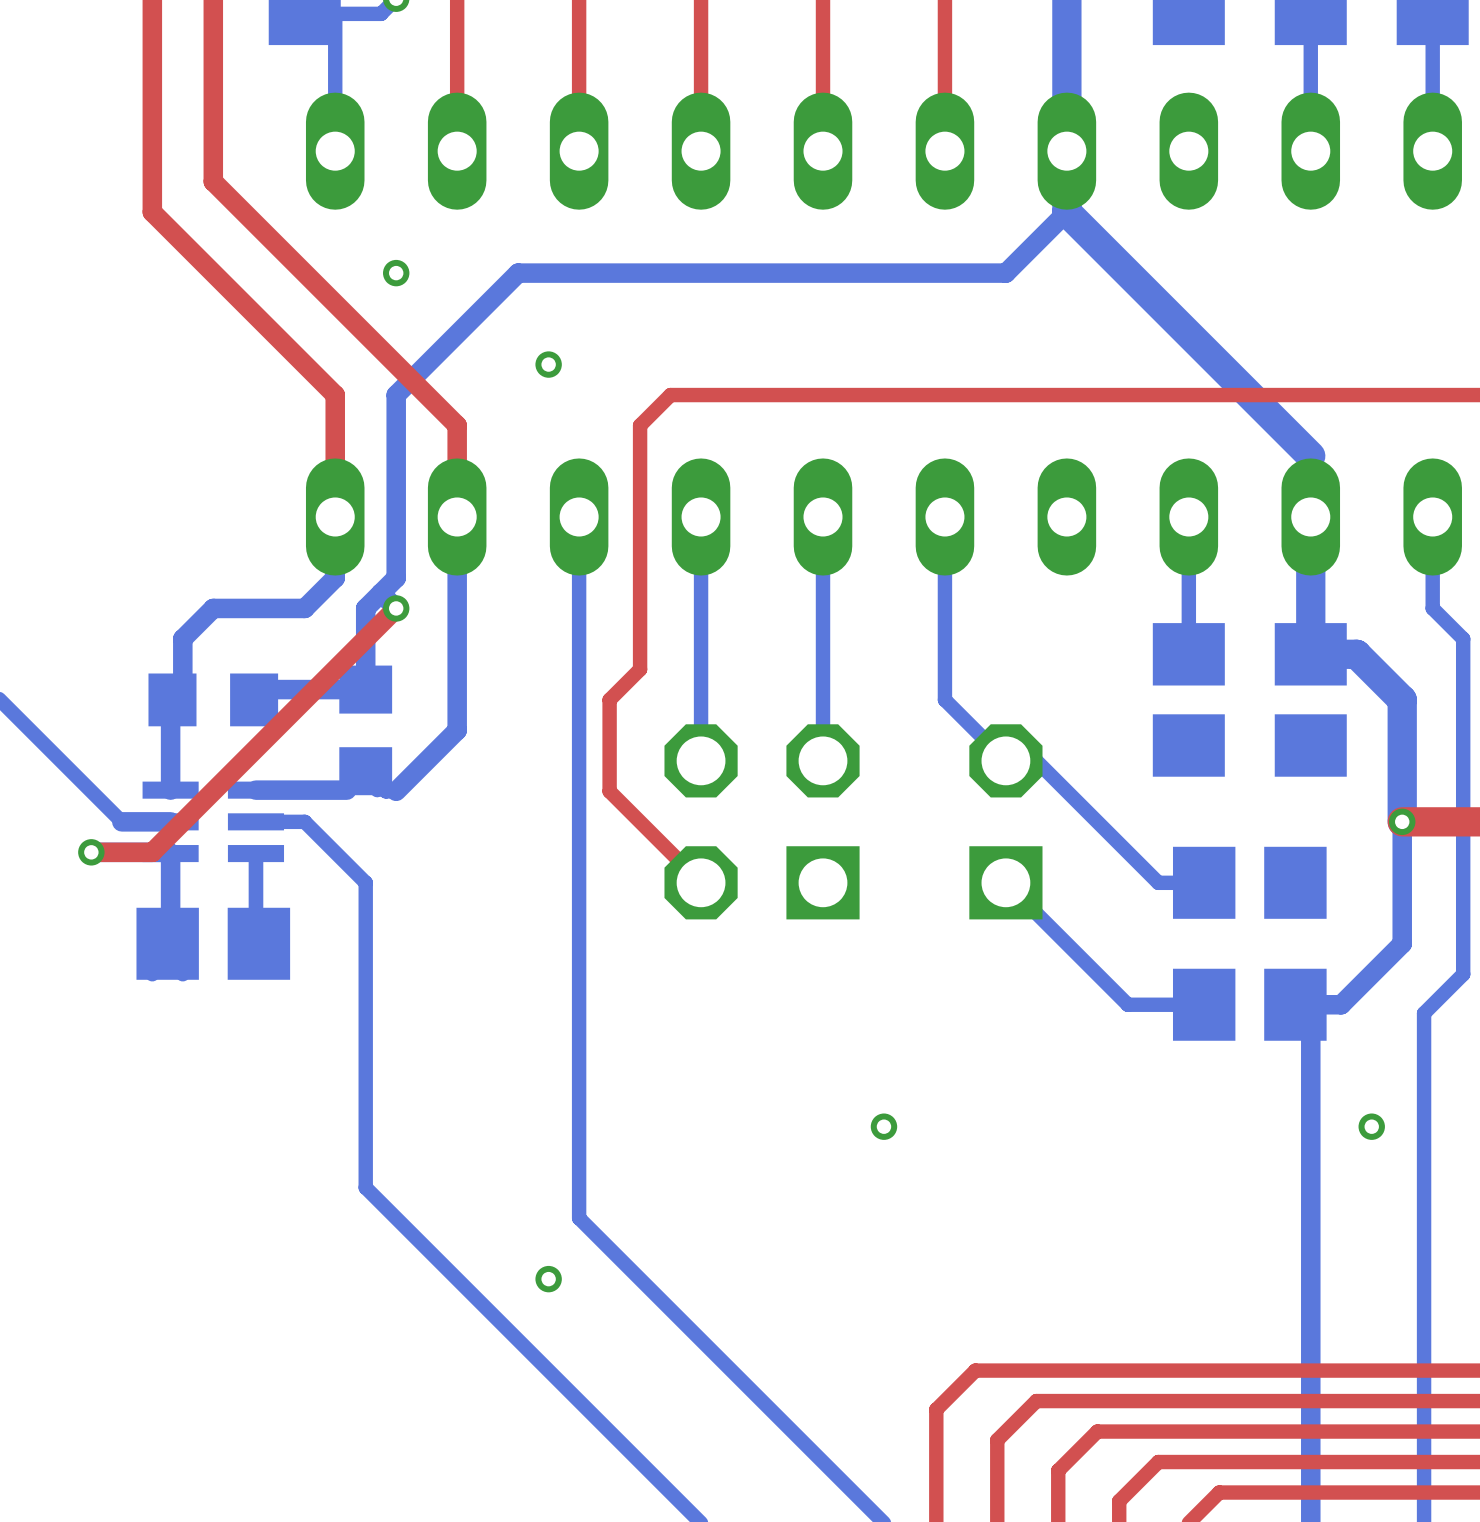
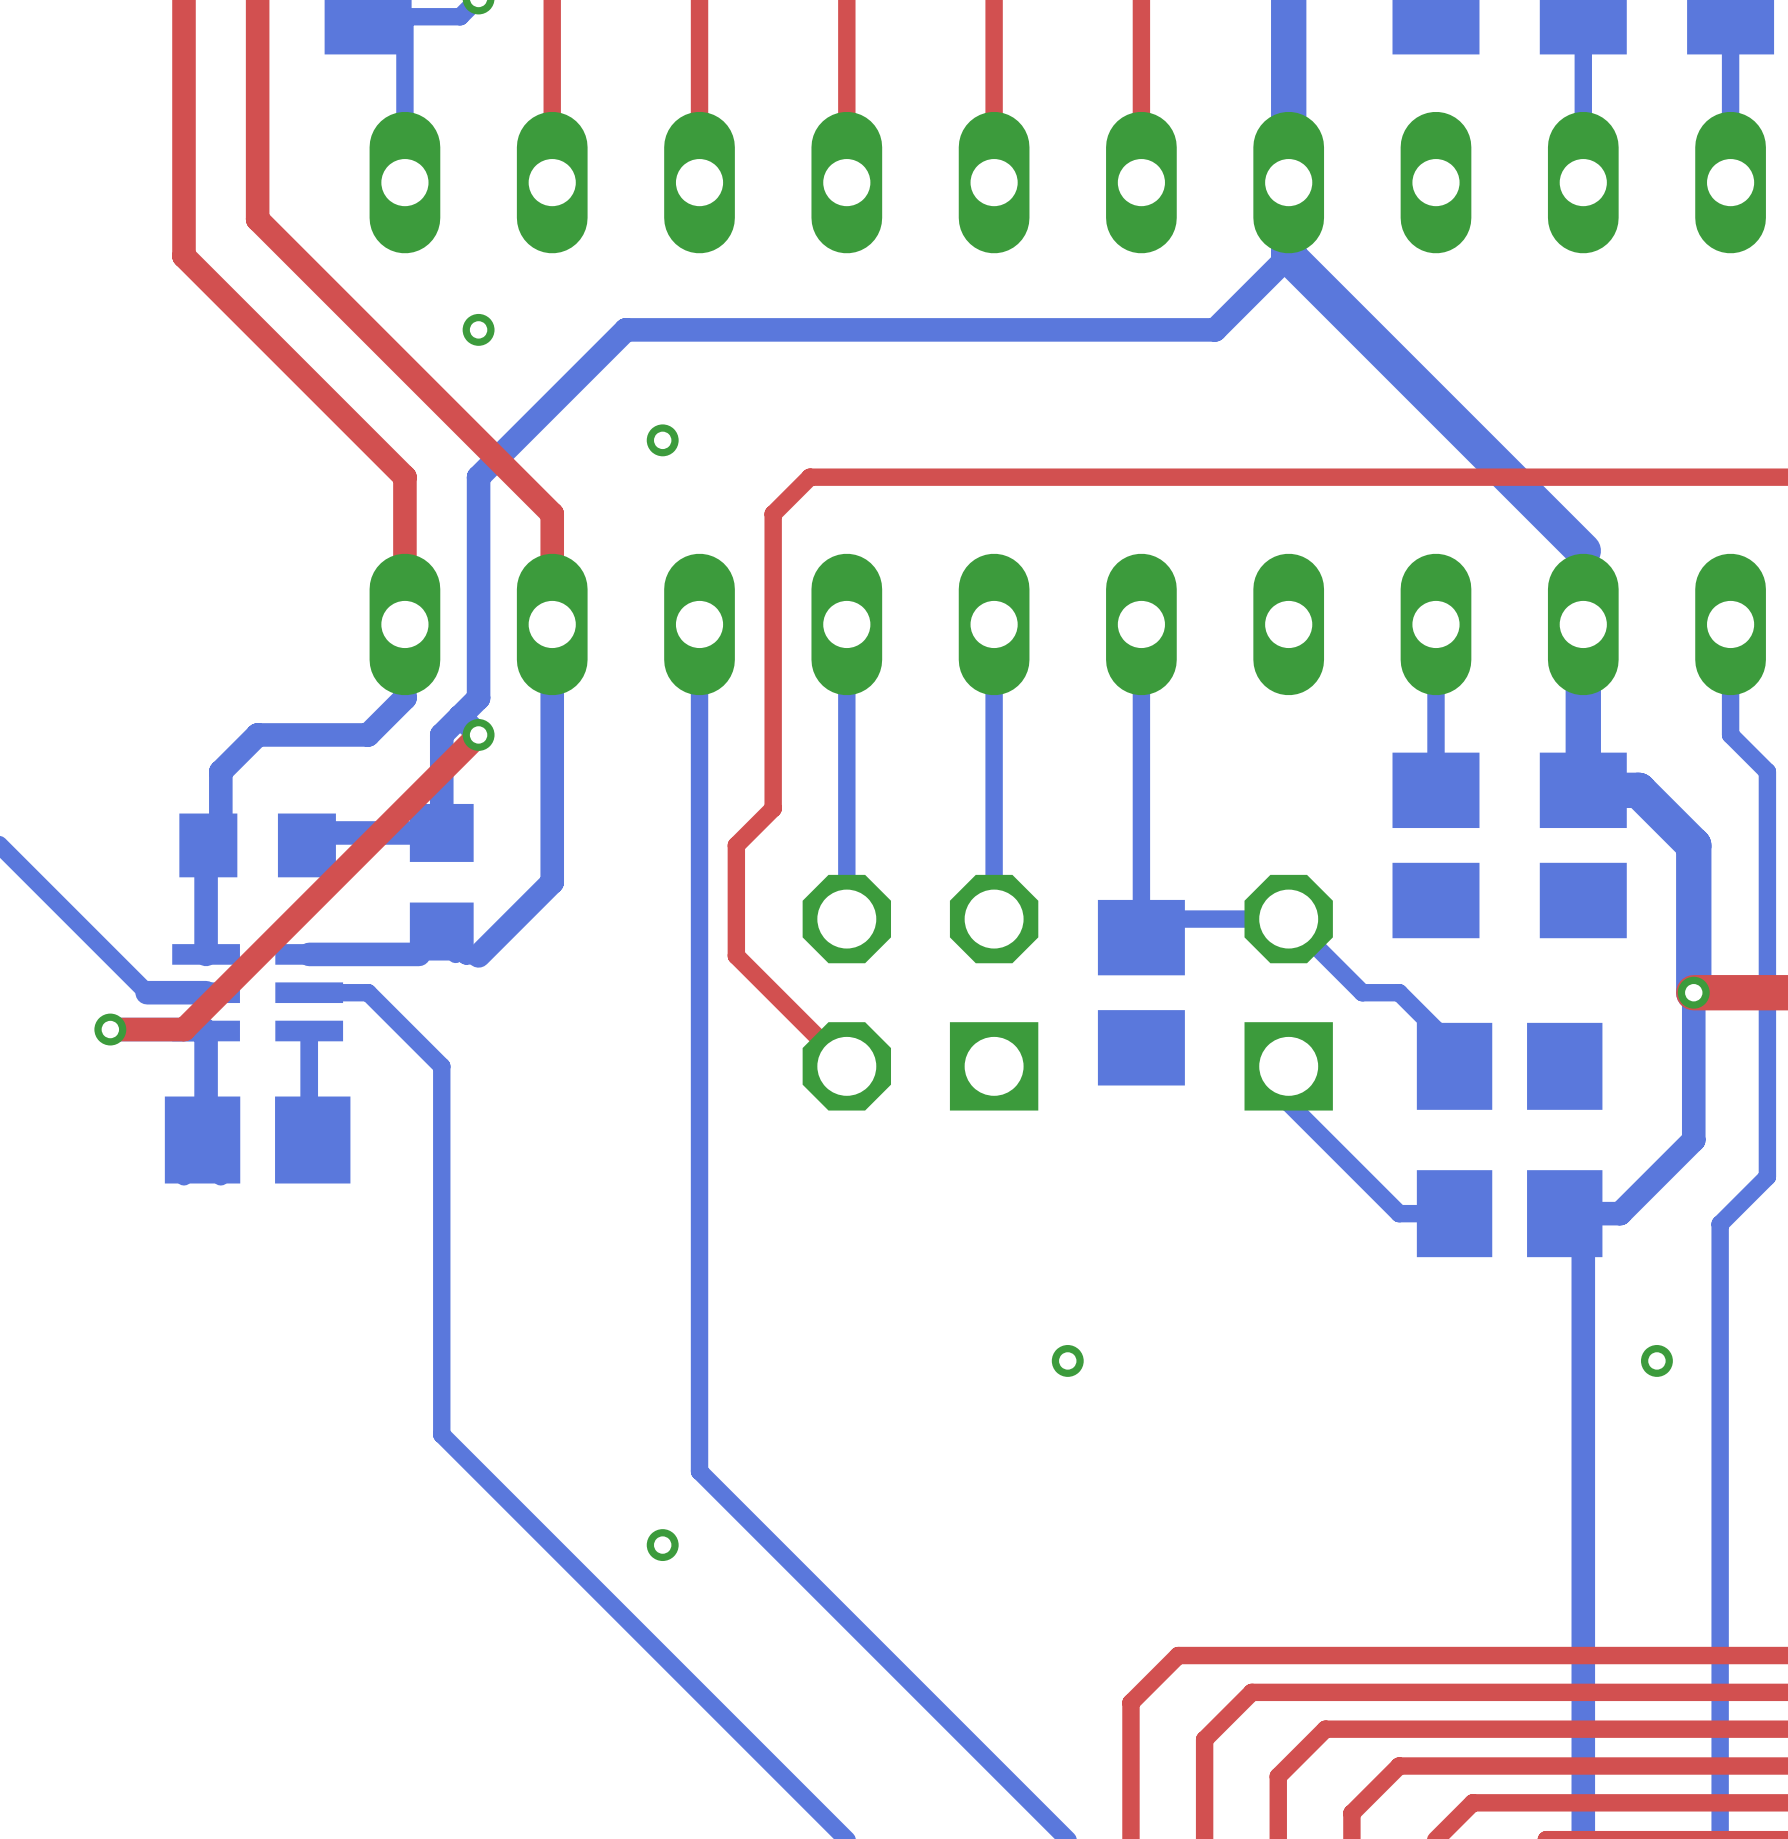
bottom track: (944, 699) (1005, 760) -> (1141, 845) (1141, 919) (1215, 919)
bottom track: (1036, 760) (1158, 882) (1204, 882) -> (1251, 919) (1288, 919) (1362, 992) (1399, 992) (1435, 1029) (1454, 1066)
part: none -> (1141, 992)
part position: (1005, 821) -> (1288, 992)
bottom track: (1005, 882) (1127, 1004) (1158, 1004) -> (1288, 1066) (1288, 1103) (1399, 1213)

